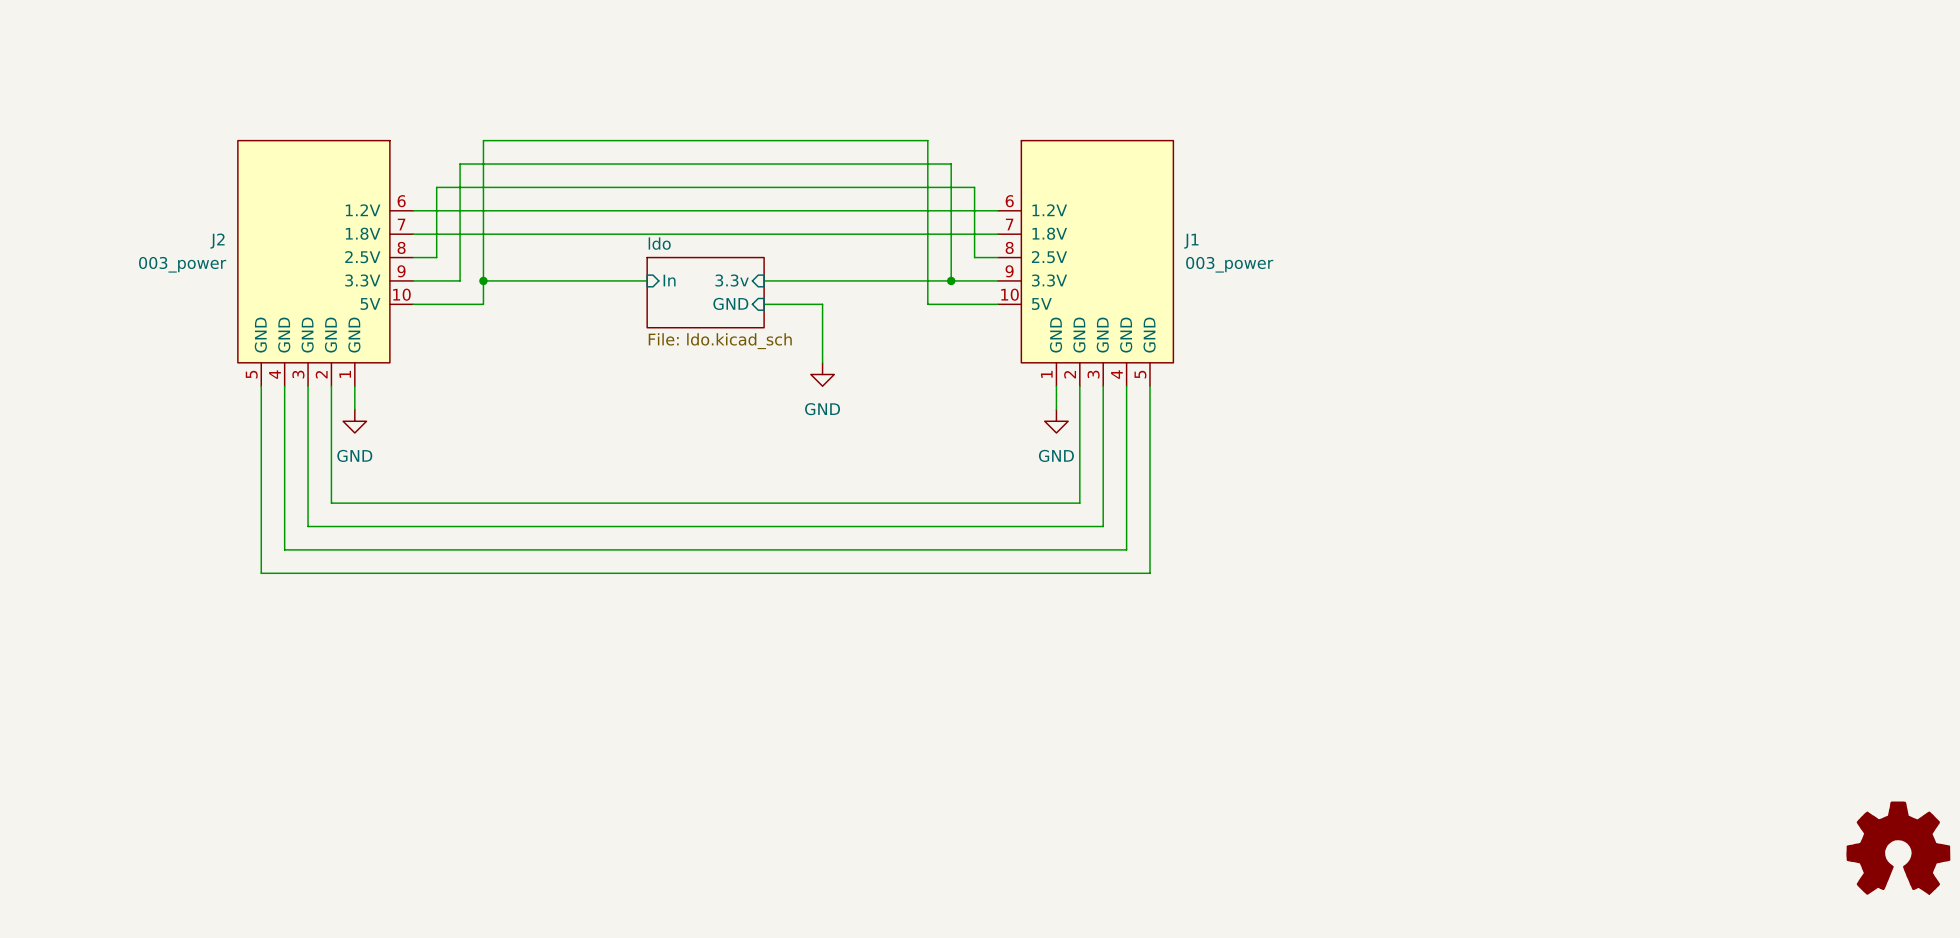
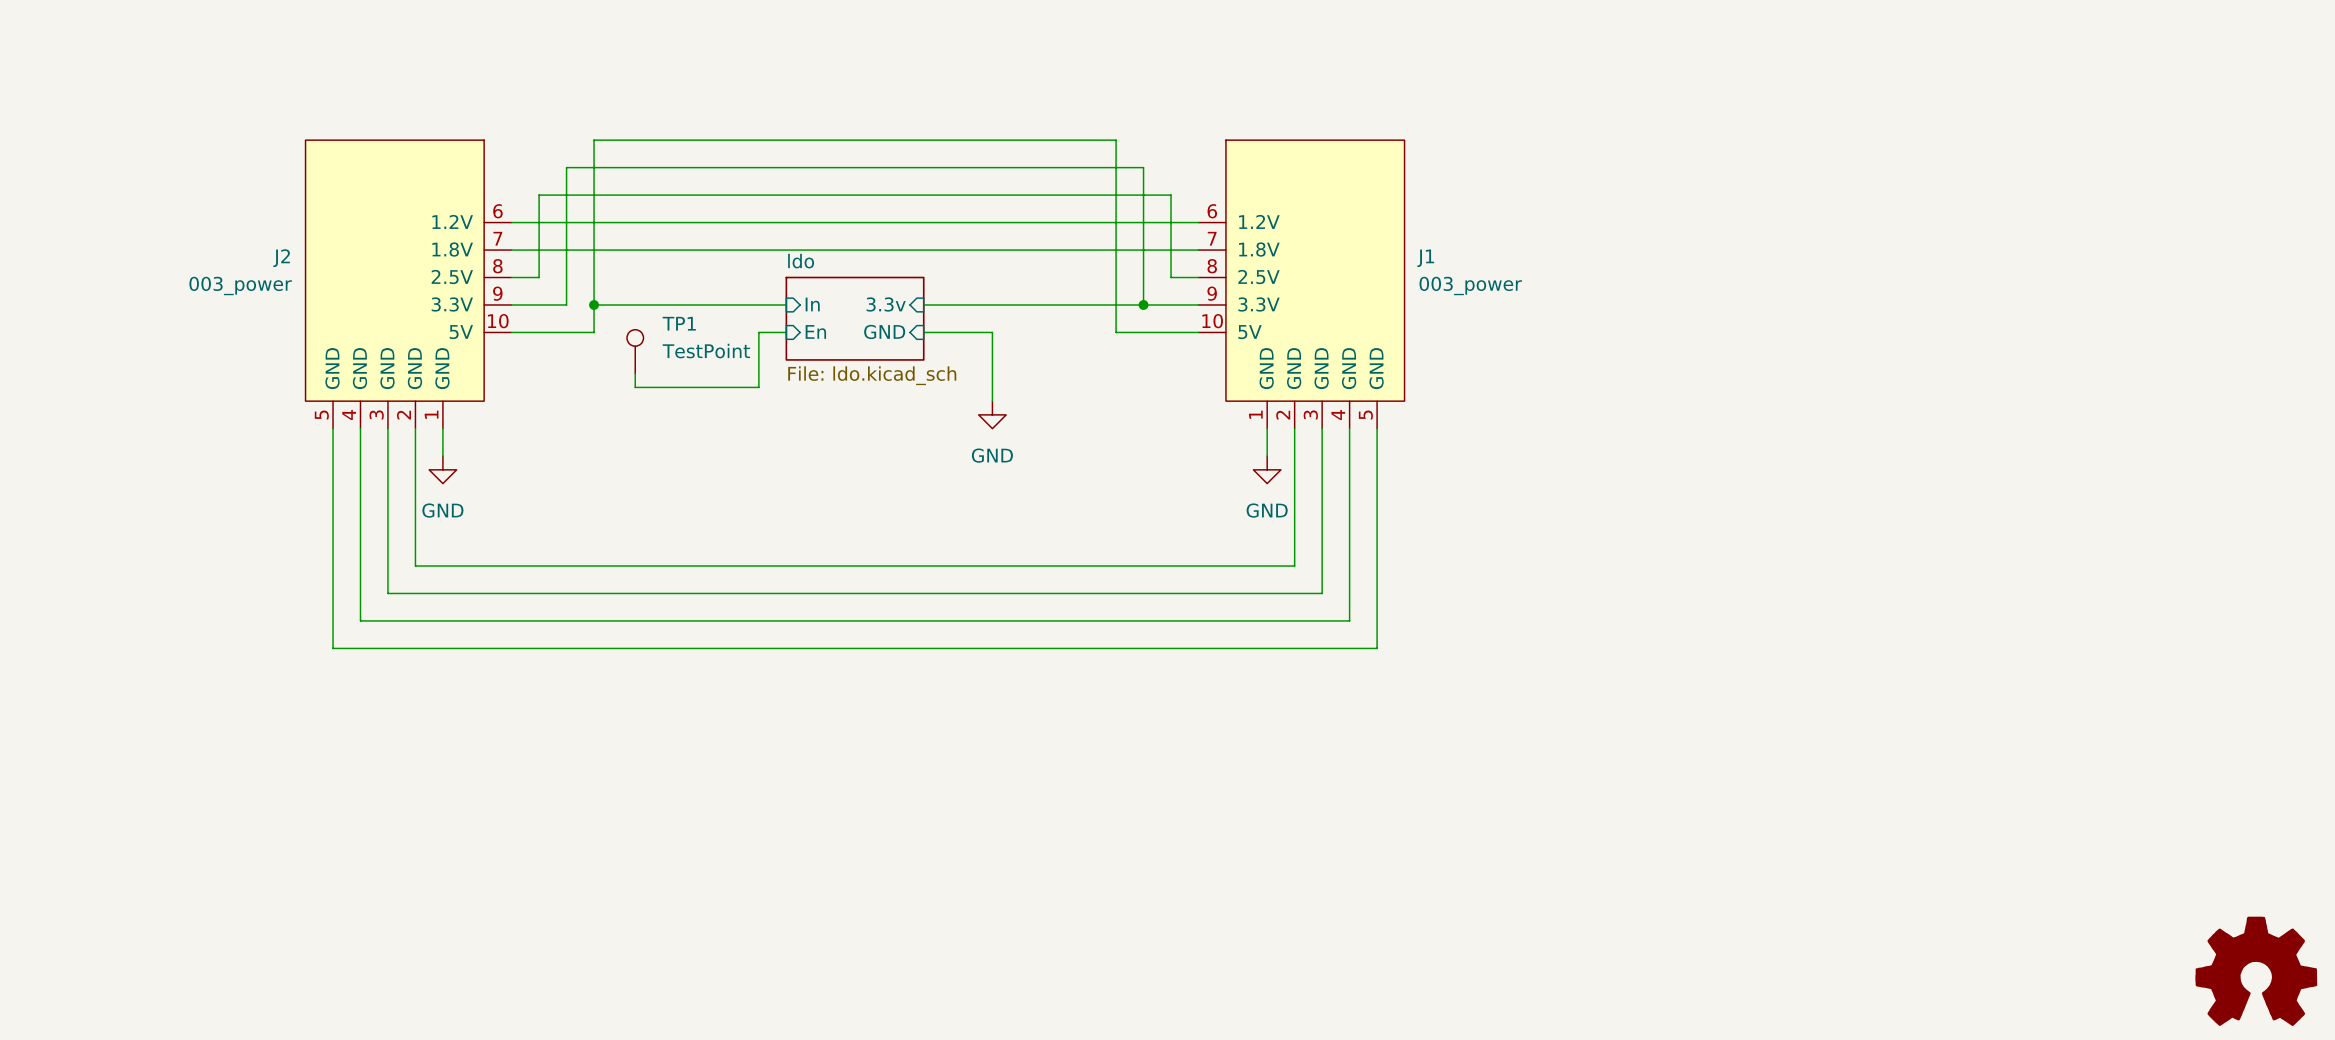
sheet pin: none -> En (815, 331)
wire: none -> (786, 332) (758, 332) (758, 387) (635, 387) (635, 373)
TP1: none -> TestPoint (635, 351)

